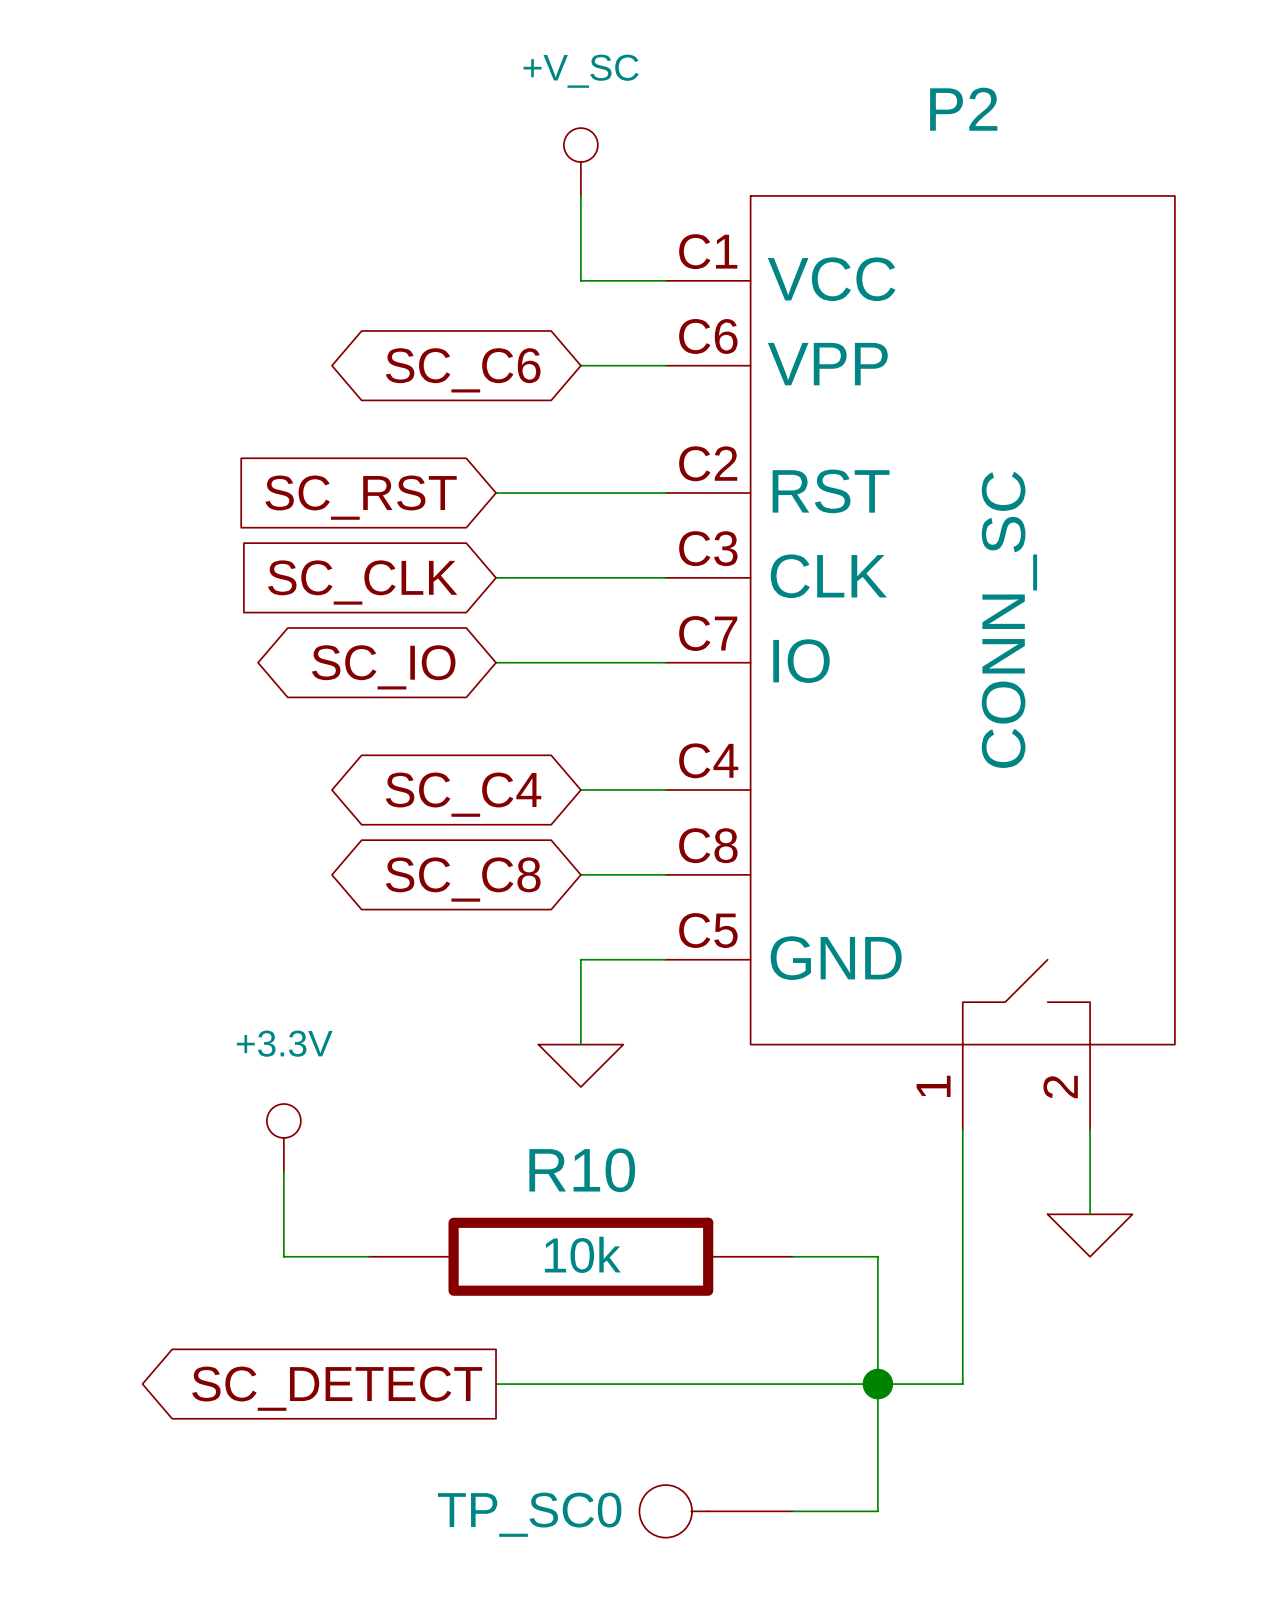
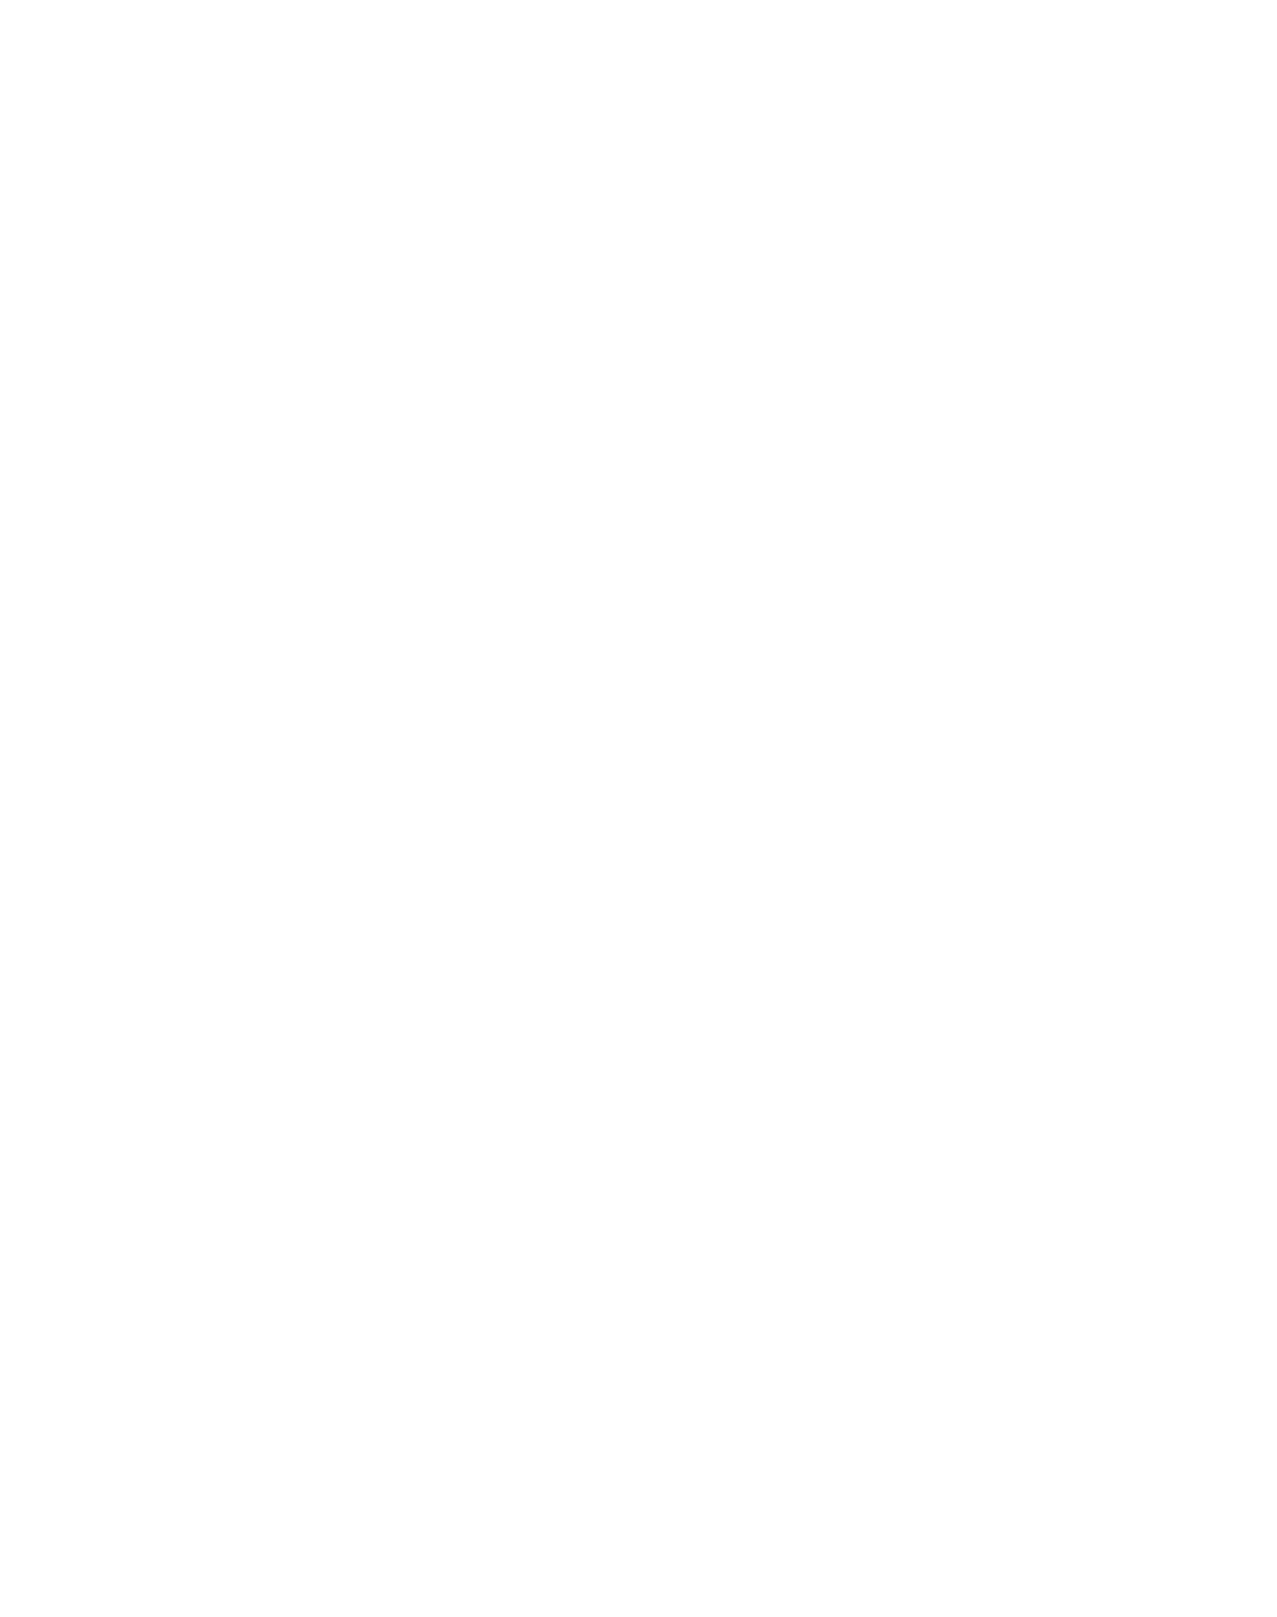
power symbol: +V_SC (580, 162) -> none
wire: (580, 195) (580, 280) (665, 280) -> none
wire: (580, 365) (665, 365) -> none
global label: SC_C6 (463, 370) -> none
wire: (496, 492) (665, 492) -> none
global label: SC_RST (361, 497) -> none
wire: (496, 577) (665, 577) -> none
global label: SC_CLK (362, 582) -> none
wire: (496, 662) (665, 662) -> none
P2: CONN_SC (920, 662) -> none
global label: SC_IO (383, 667) -> none
wire: (580, 790) (665, 790) -> none
global label: SC_C4 (463, 794) -> none
wire: (580, 874) (665, 874) -> none
global label: SC_C8 (463, 879) -> none
wire: (665, 959) (580, 959) (580, 1044) -> none
power symbol: (580, 1065) -> none
wire: (962, 1129) (962, 1384) (496, 1384) -> none
wire: (1090, 1129) (1090, 1214) -> none
power symbol: +3.3V (283, 1137) -> none
wire: (283, 1171) (283, 1256) (368, 1256) -> none
power symbol: (1090, 1235) -> none
R10: 10k (580, 1256) -> none
wire: (793, 1256) (877, 1256) (877, 1511) (793, 1511) -> none
junction: (877, 1384) -> none
global label: SC_DETECT (337, 1388) -> none
TP_SC0: (716, 1511) -> none

